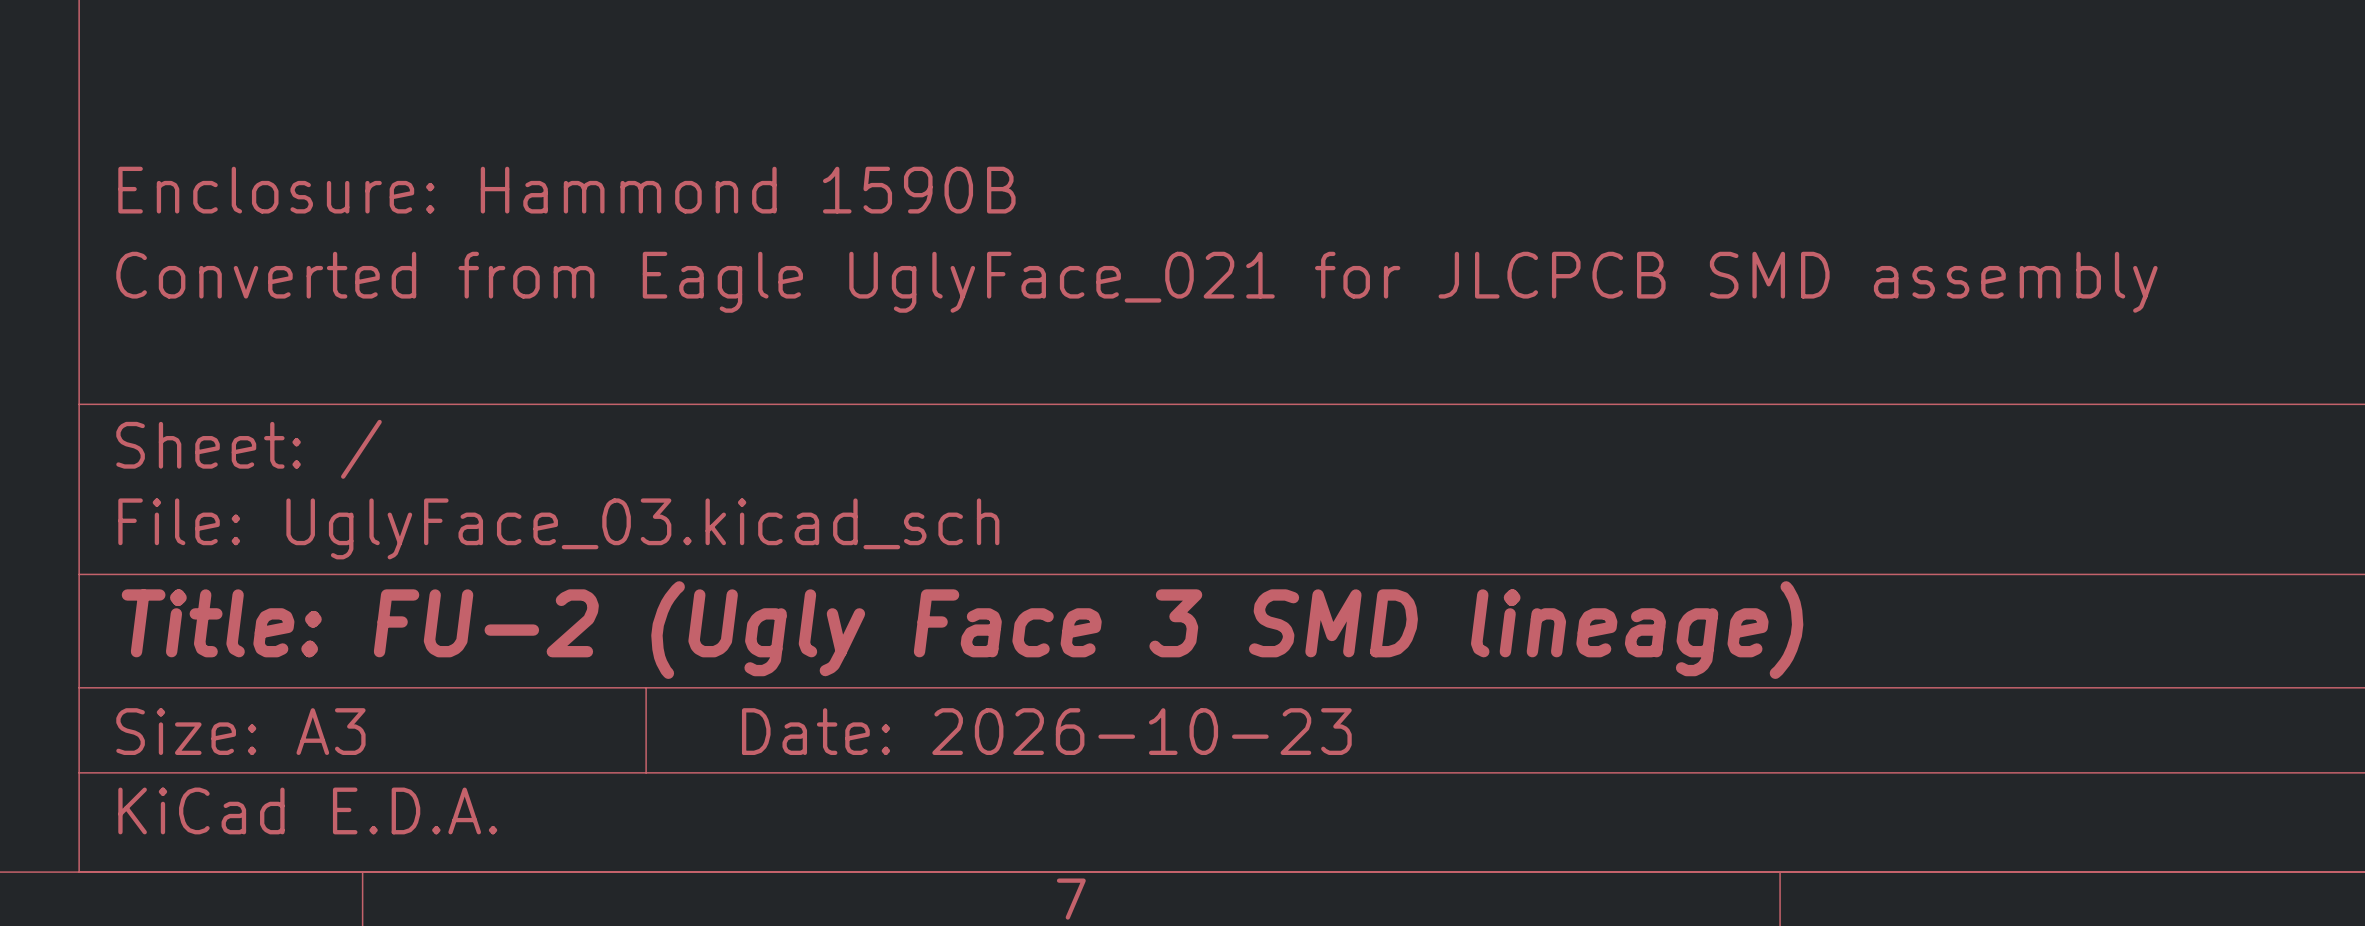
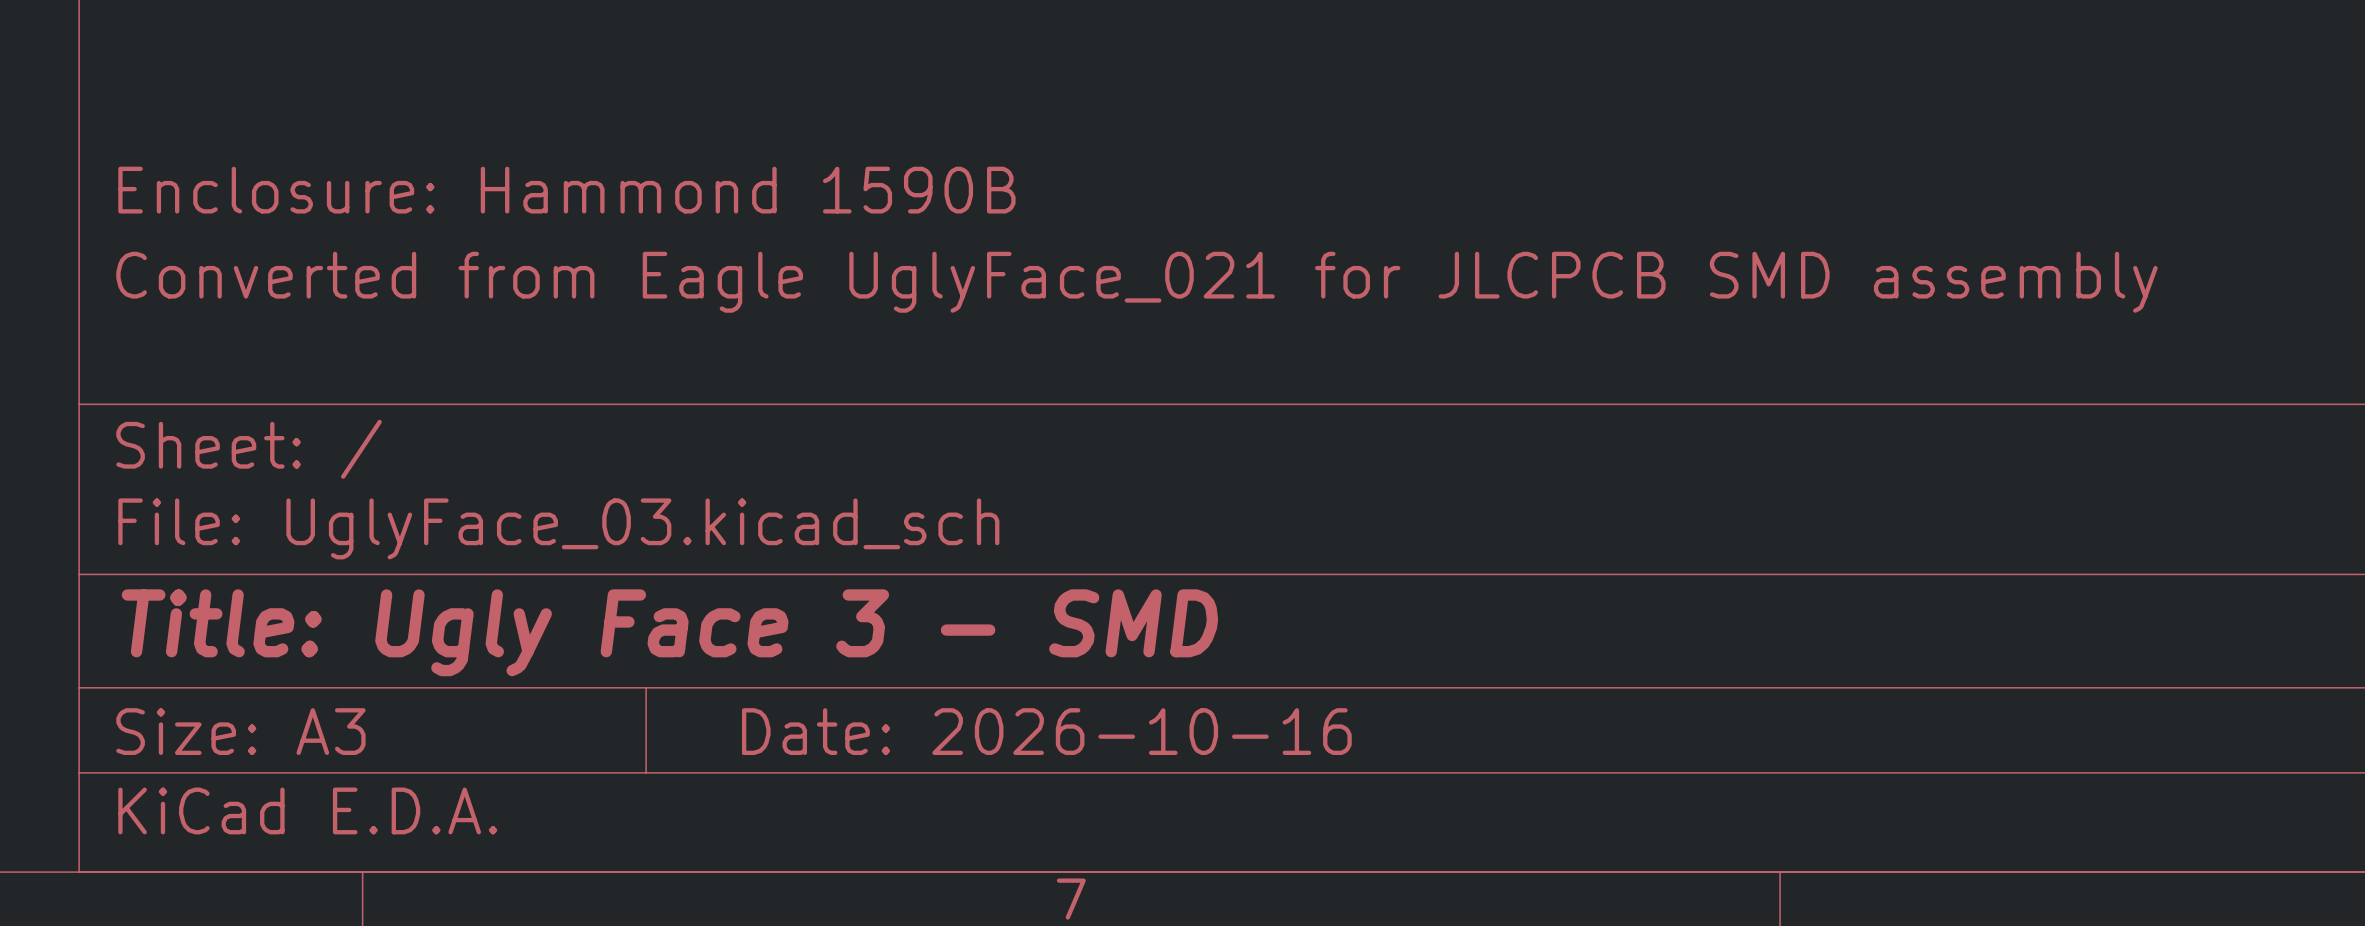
title block: Title: FU-2 (Ugly Face 3 SMD lineage) (962, 630) -> Title: Ugly Face 3 - SMD (669, 632)
title block: Date: 2026-10-23 (1046, 731) -> Date: 2026-10-16 (1046, 731)

